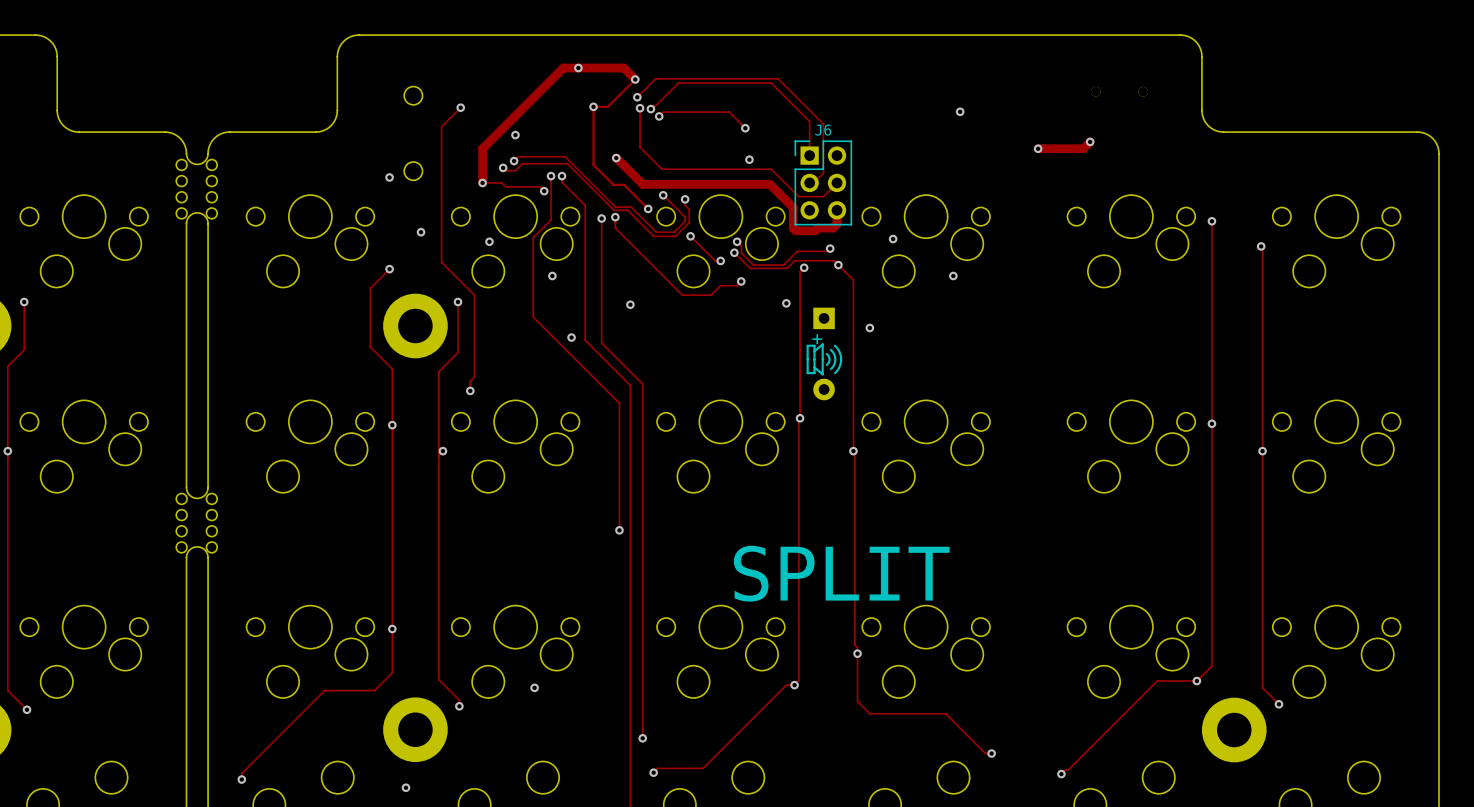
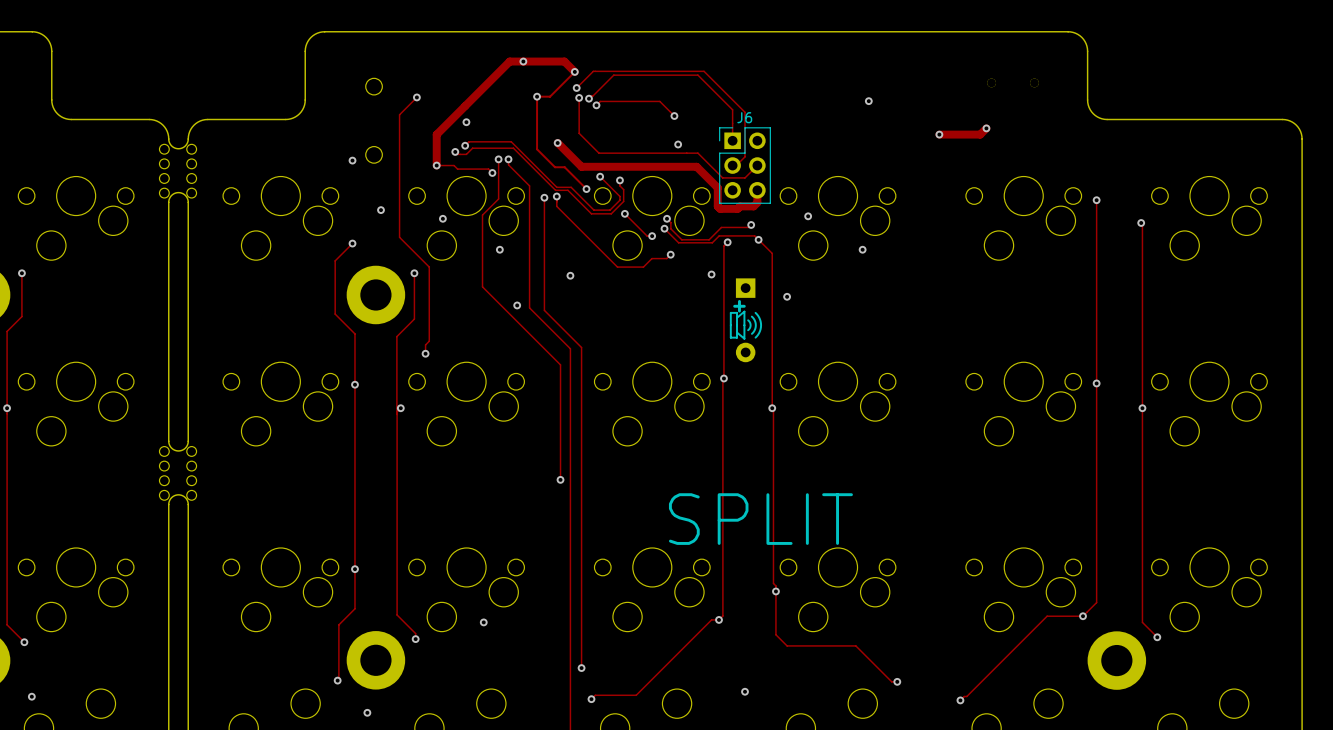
track: (374, 690) (324, 690) (241, 773) (241, 779) -> (338, 624) (337, 680)
via: none -> (337, 680)
via: none -> (745, 691)
via: none -> (31, 696)
via: (241, 779) -> none

